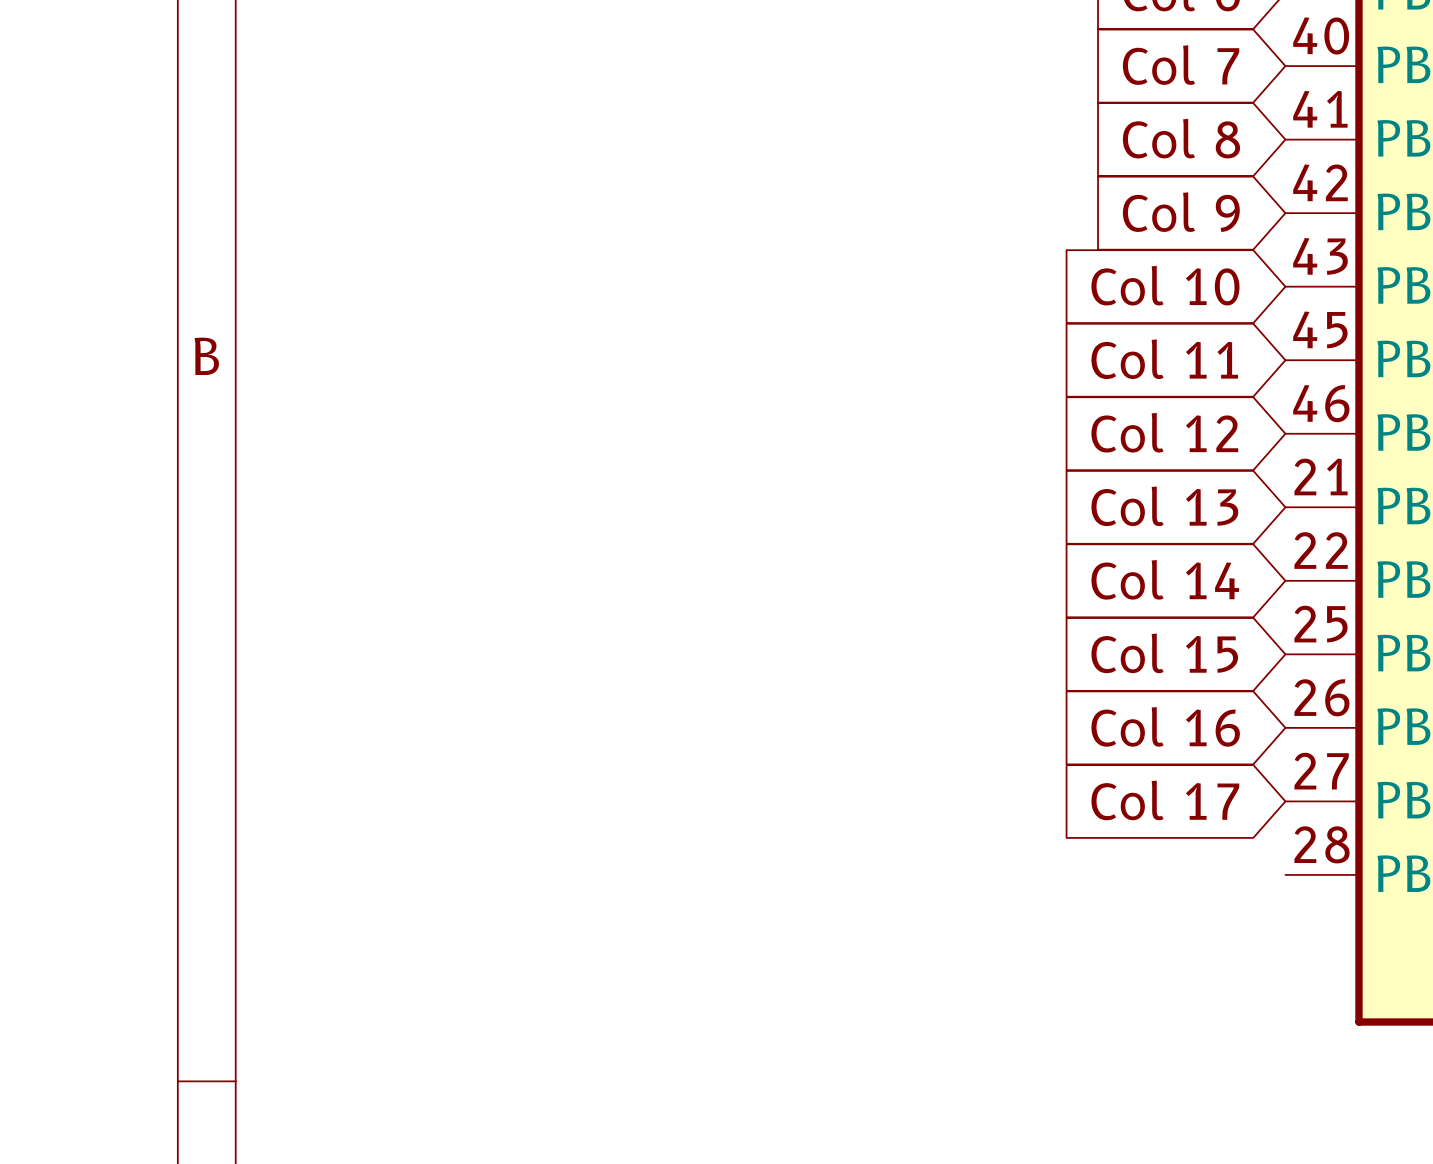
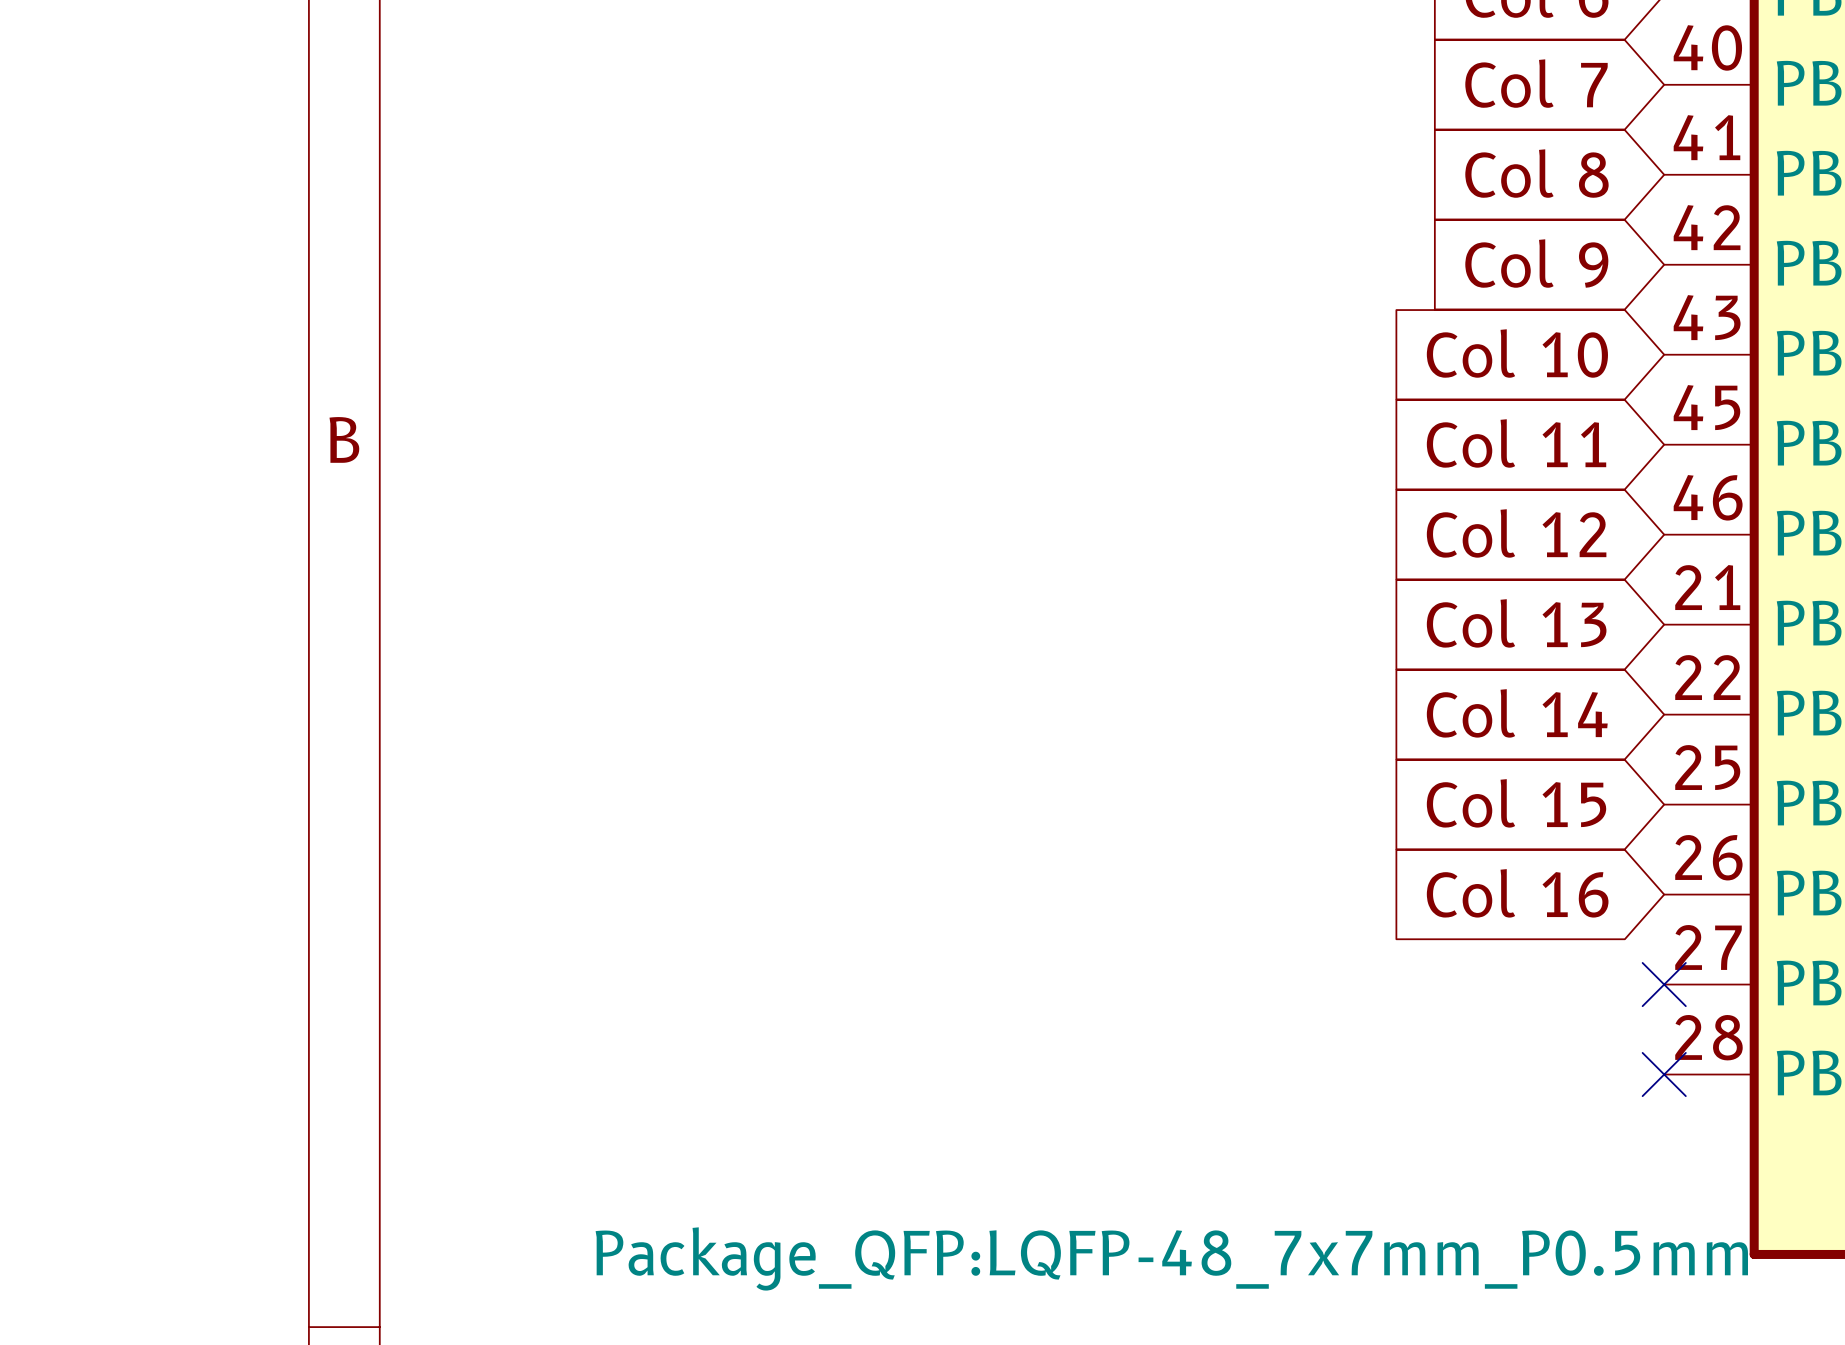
global label: Col 17 (1165, 800) -> none
no-connect mark: none -> (1664, 984)
no-connect mark: none -> (1664, 1074)
part text: none -> Package_QFP:LQFP-48_7x7mm_P0.5mm (1171, 1258)

